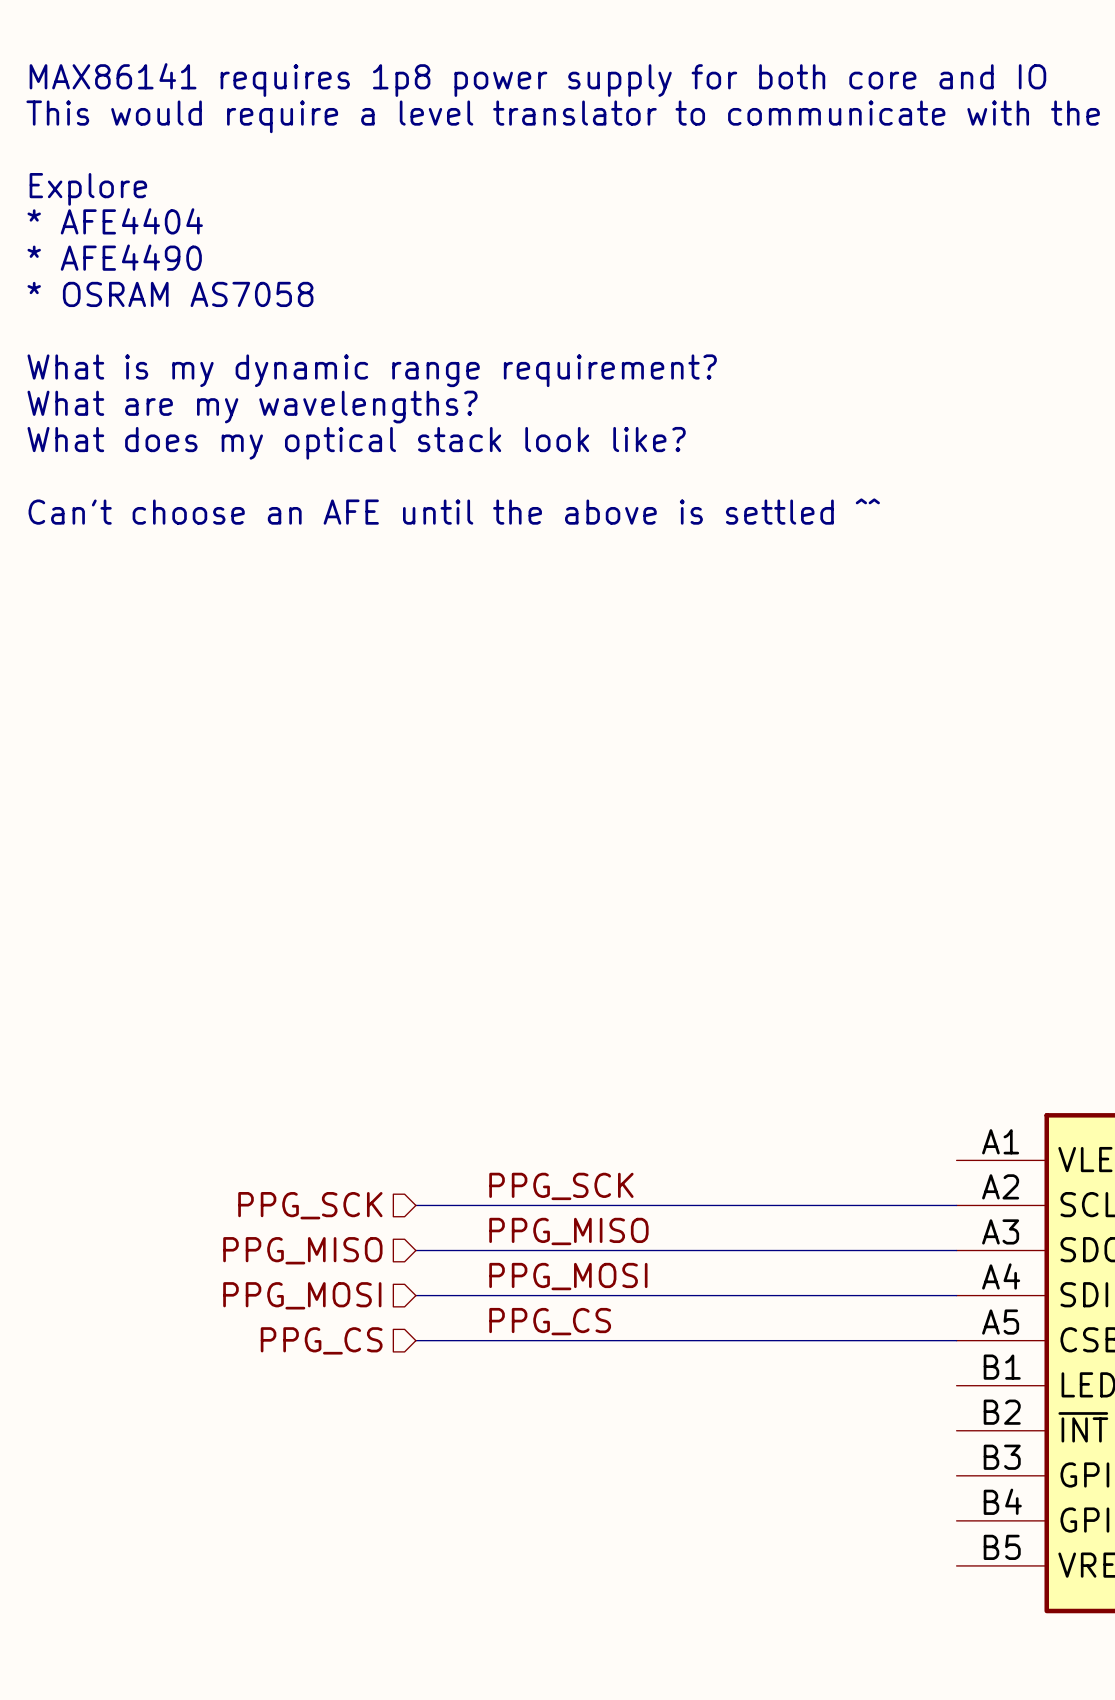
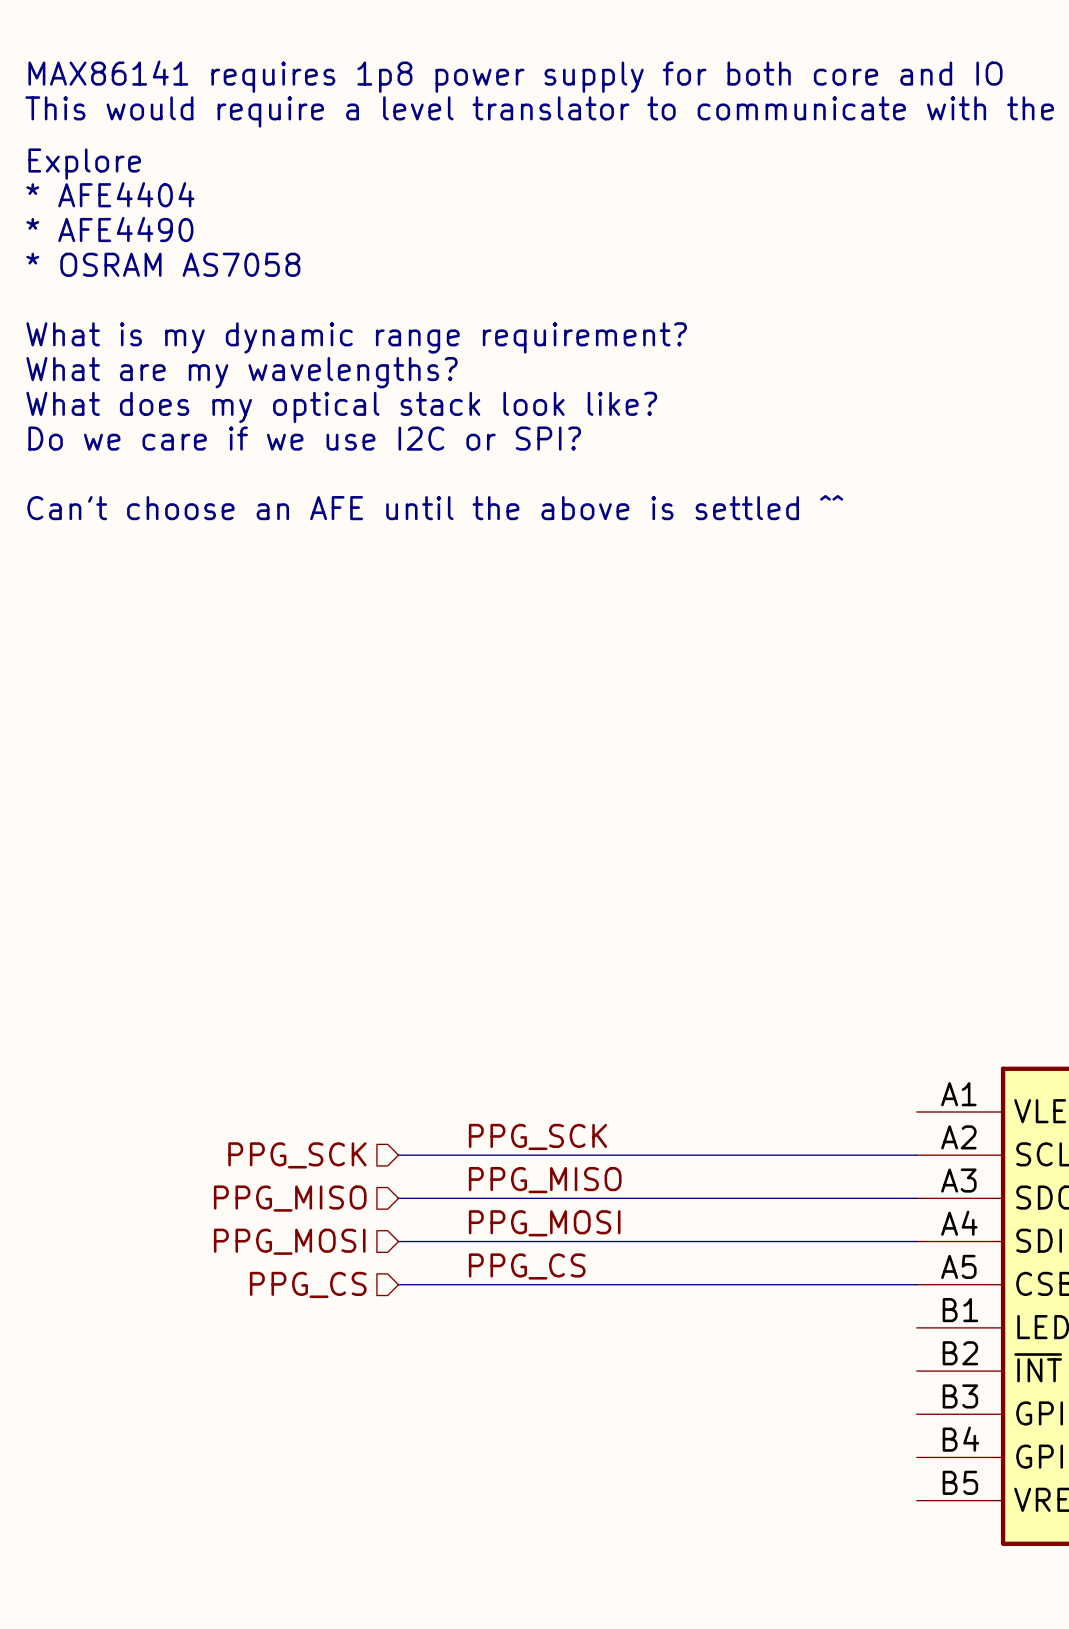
text position: Explore (88, 189) -> Explore (84, 164)
text position: * AFE4404 (115, 221) -> * AFE4404 (110, 194)
text position: * AFE4490 (114, 257) -> * AFE4490 (109, 229)
text position: * OSRAM AS7058 (170, 294) -> * OSRAM AS7058 (163, 264)
text position: What is my dynamic range requirement? (372, 370) -> What is my dynamic range requirement? (356, 337)
text position: What are my wavelengths? (252, 407) -> What are my wavelengths? (242, 372)
text position: What does my optical stack look like? (356, 443) -> What does my optical stack look like? (341, 407)
text: none -> Do we care if we use I2C or SPI? (304, 438)
text position: Can't choose an AFE until the above is settled ^^ (454, 511) -> Can't choose an AFE until the above is settled ^^ (435, 507)

